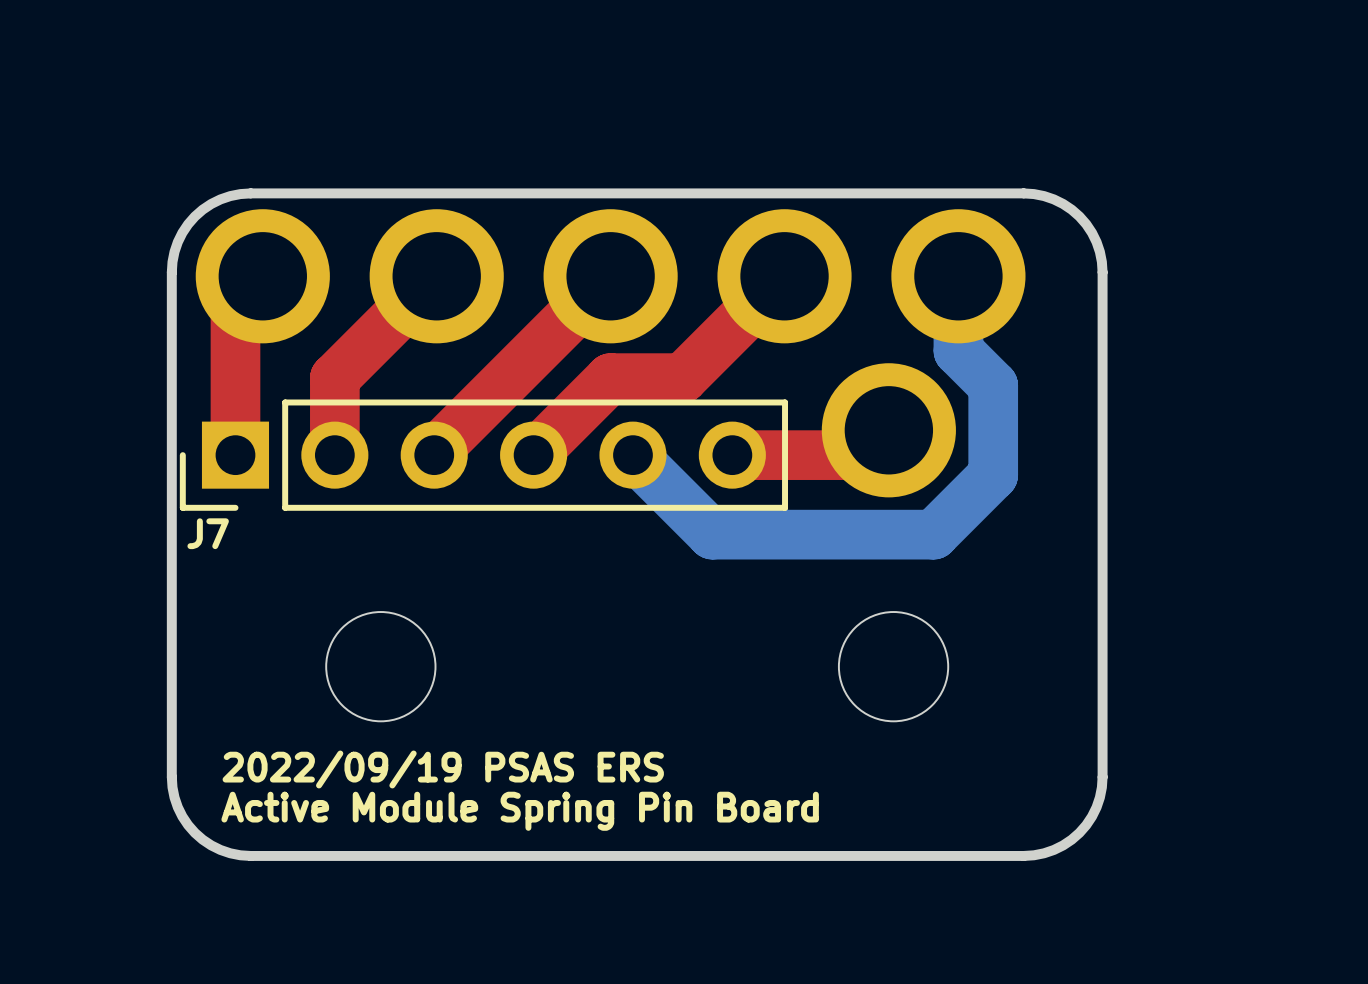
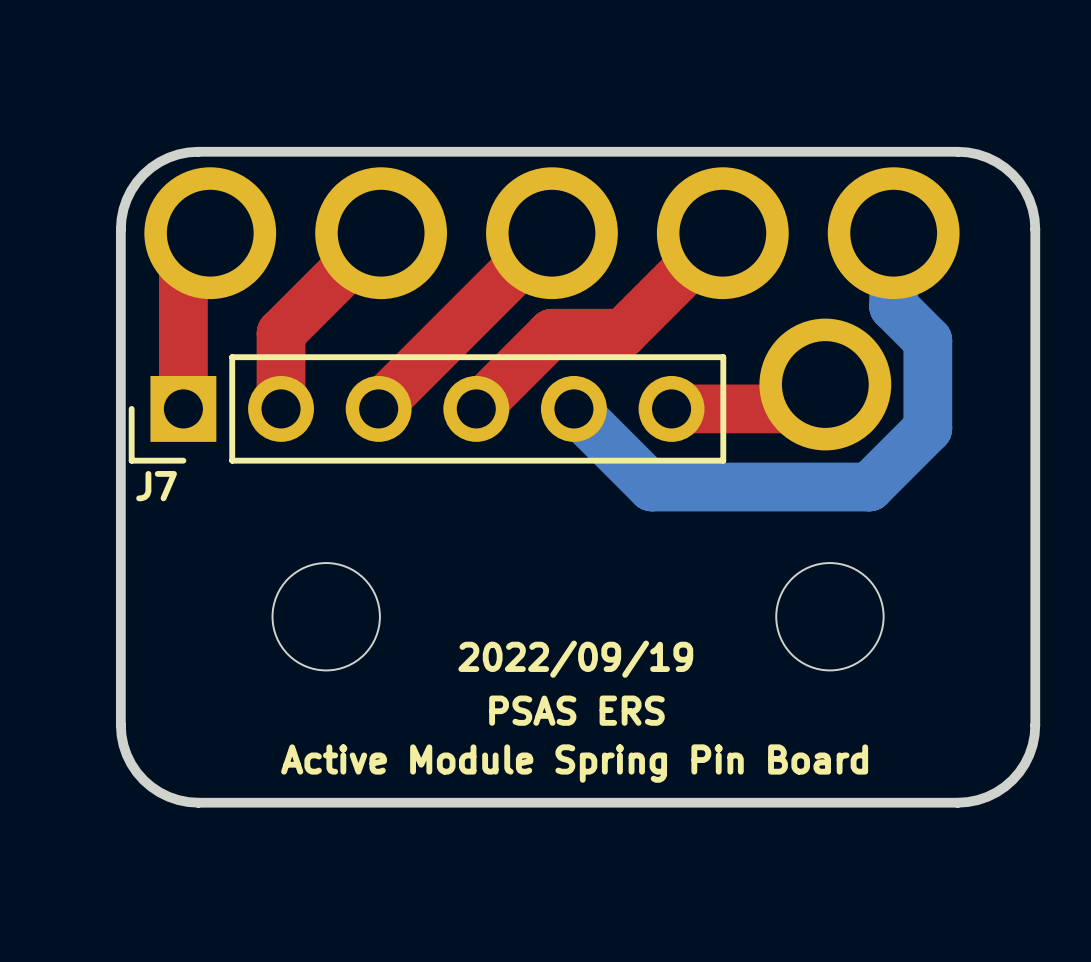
text: none -> 2022/09/19 (575, 659)
text: none -> PSAS ERS (576, 710)
text: 2022/09/19 PSAS ERS (443, 769) -> none
text position: Active Module Spring Pin Board (520, 811) -> Active Module Spring Pin Board (574, 763)

